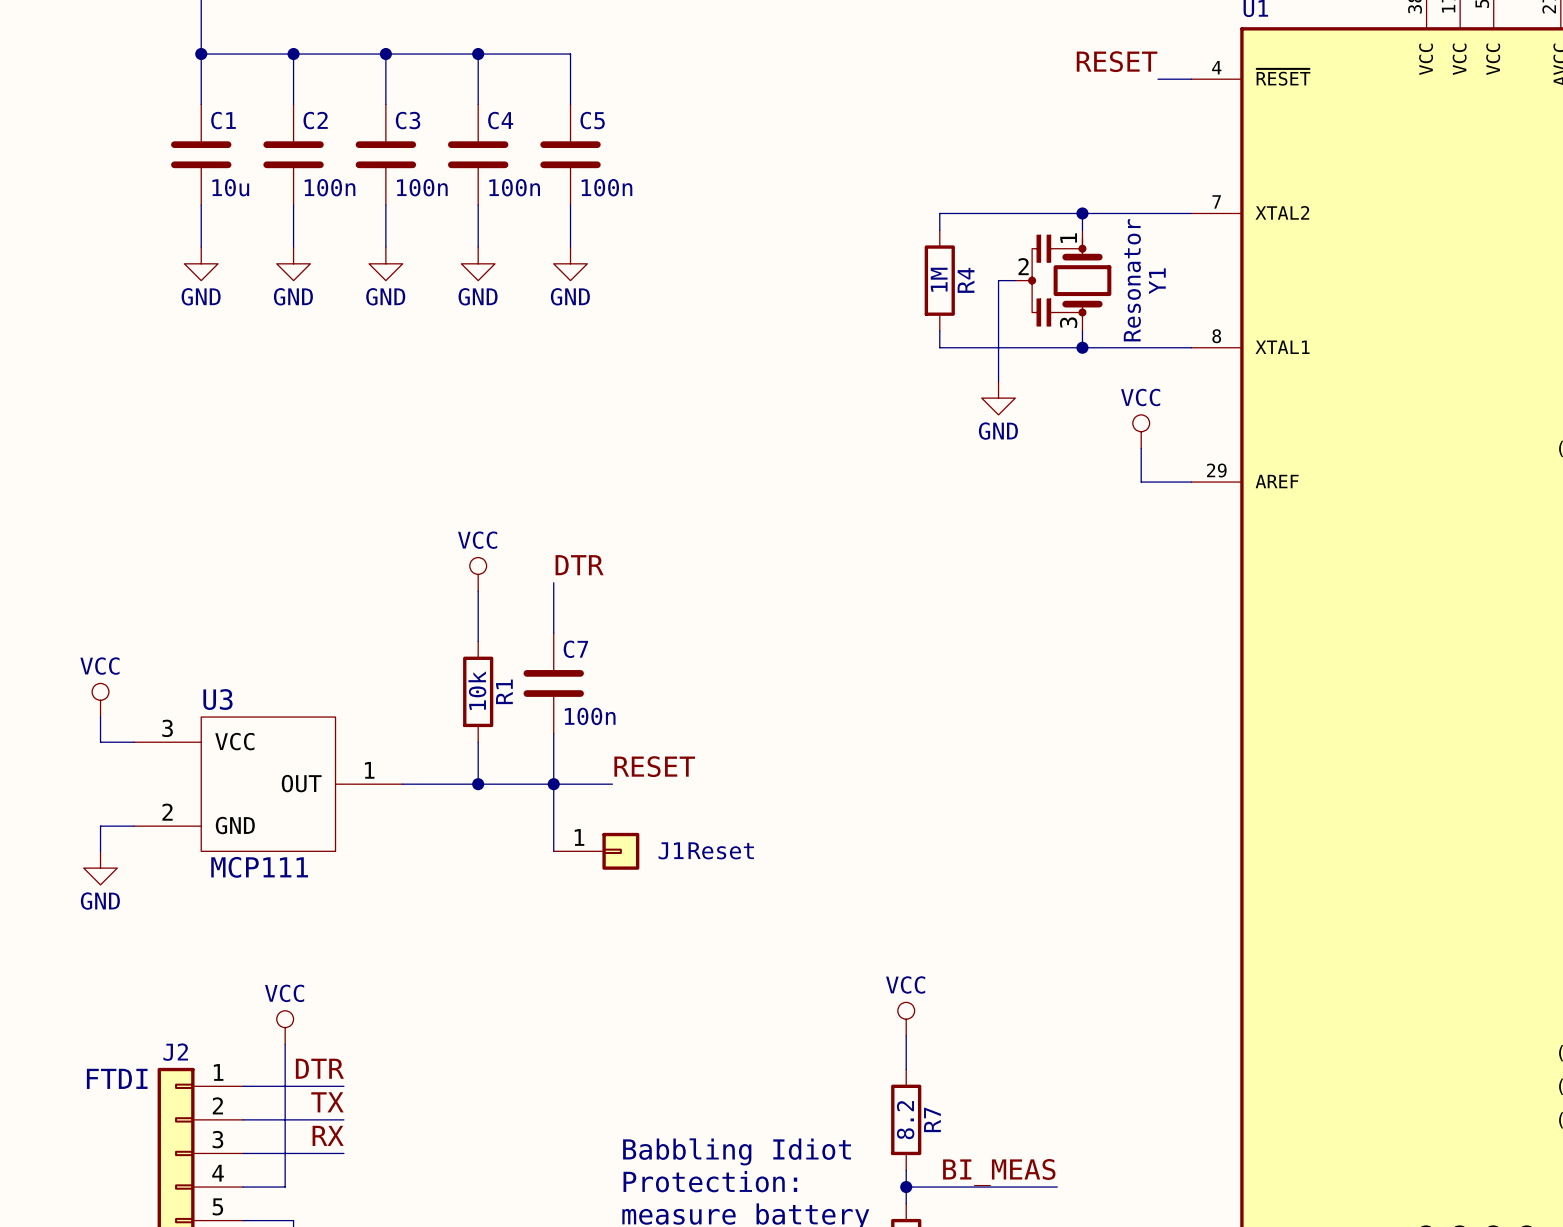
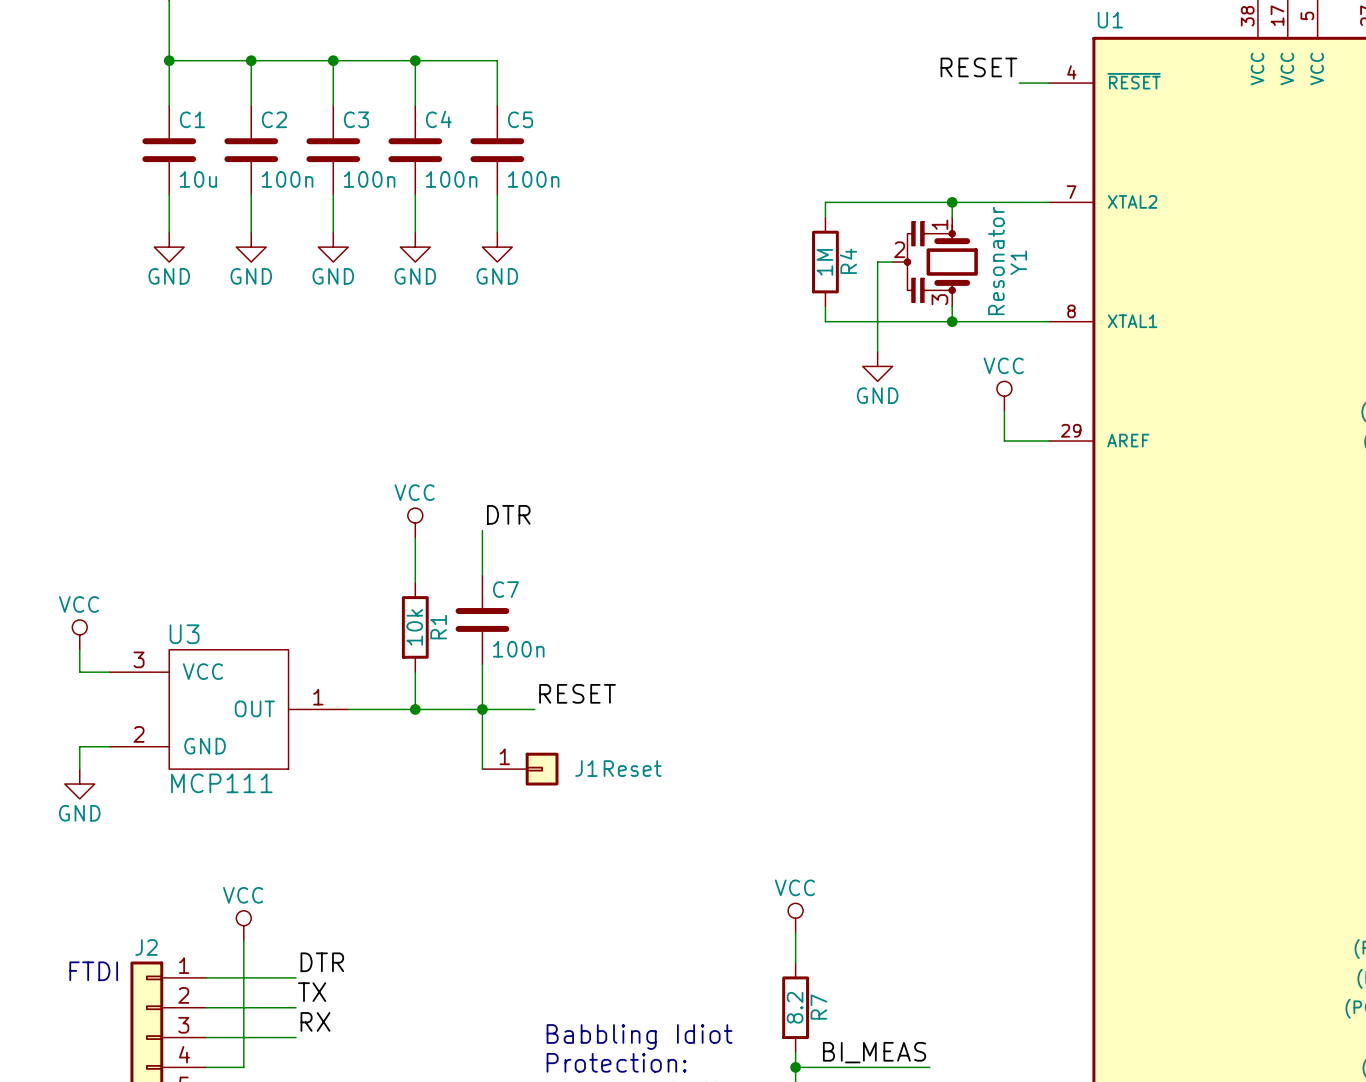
label position: DTR (319, 1068) -> DTR (322, 962)
label position: TX (327, 1102) -> TX (312, 992)
label position: RX (328, 1135) -> RX (315, 1021)

